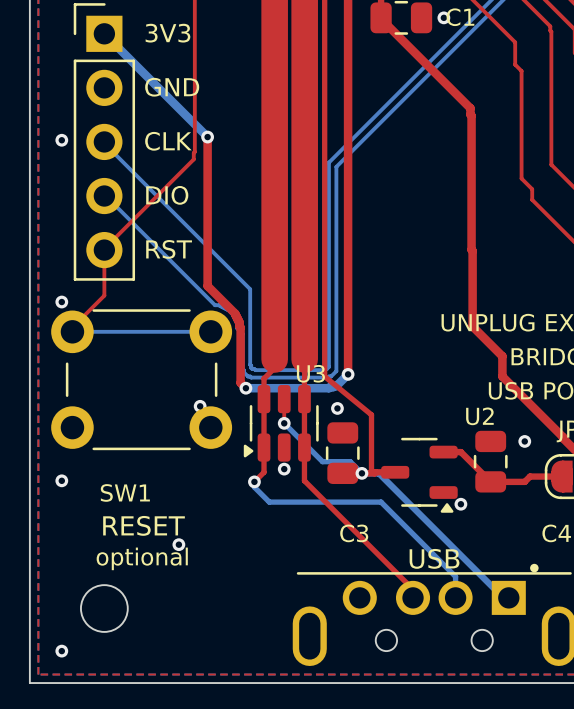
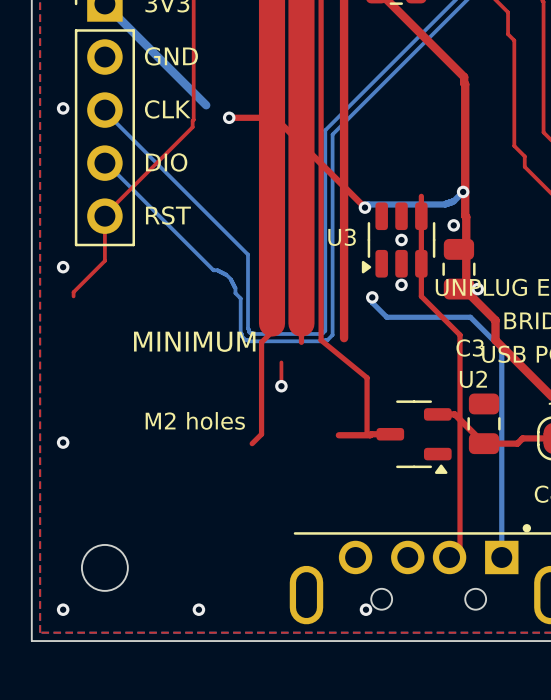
top track: (207, 137) (207, 286) (235, 313) (239, 322) (240, 382) (245, 388) -> none
via position: (207, 137) -> (229, 117)
top track: none -> (229, 117) (275, 117) (364, 207)
bottom track: none -> (463, 191) (453, 201) (445, 204) (368, 204) (364, 207)
via: none -> (463, 191)
top track: none -> (421, 196) (421, 296) (460, 335) (460, 557)
via: none -> (364, 207)
via: none -> (453, 225)
via: none -> (401, 239)
via: none -> (401, 284)
via: none -> (477, 289)
bottom track: (72, 331) (210, 331) -> none
via: none -> (372, 297)
U3 name position: U3 (310, 373) -> U3 (342, 237)
bottom track: (348, 374) (336, 386) (328, 388) (245, 388) -> none
via: (348, 374) -> none
text: none -> MINIMUM (194, 341)
top track: (304, 378) (304, 480) (413, 589) (413, 597) -> none
SW1: (141, 379) -> none
via: (245, 388) -> none
via: (200, 406) -> none
via: (337, 408) -> none
U3 position: (281, 423) -> (398, 239)
bottom track: (284, 423) (322, 461) (350, 461) (361, 473) (378, 473) (503, 597) (508, 597) -> (372, 297) (372, 302) (386, 317) (470, 317) (501, 348) (501, 557)
via: (524, 441) -> none
C3 position: (342, 453) -> (458, 269)
text: none -> M2 holes (195, 420)
via: (284, 469) -> none
via: (361, 473) -> none
bottom track: (254, 481) (254, 487) (269, 502) (381, 502) (455, 576) (455, 597) -> none
via: (254, 481) -> none
via: (460, 504) -> none
text: RESET (144, 525) -> none
via: (178, 544) -> none
text: optional (142, 558) -> none
text: USB (434, 558) -> none
via: none -> (198, 609)
via: none -> (366, 609)

